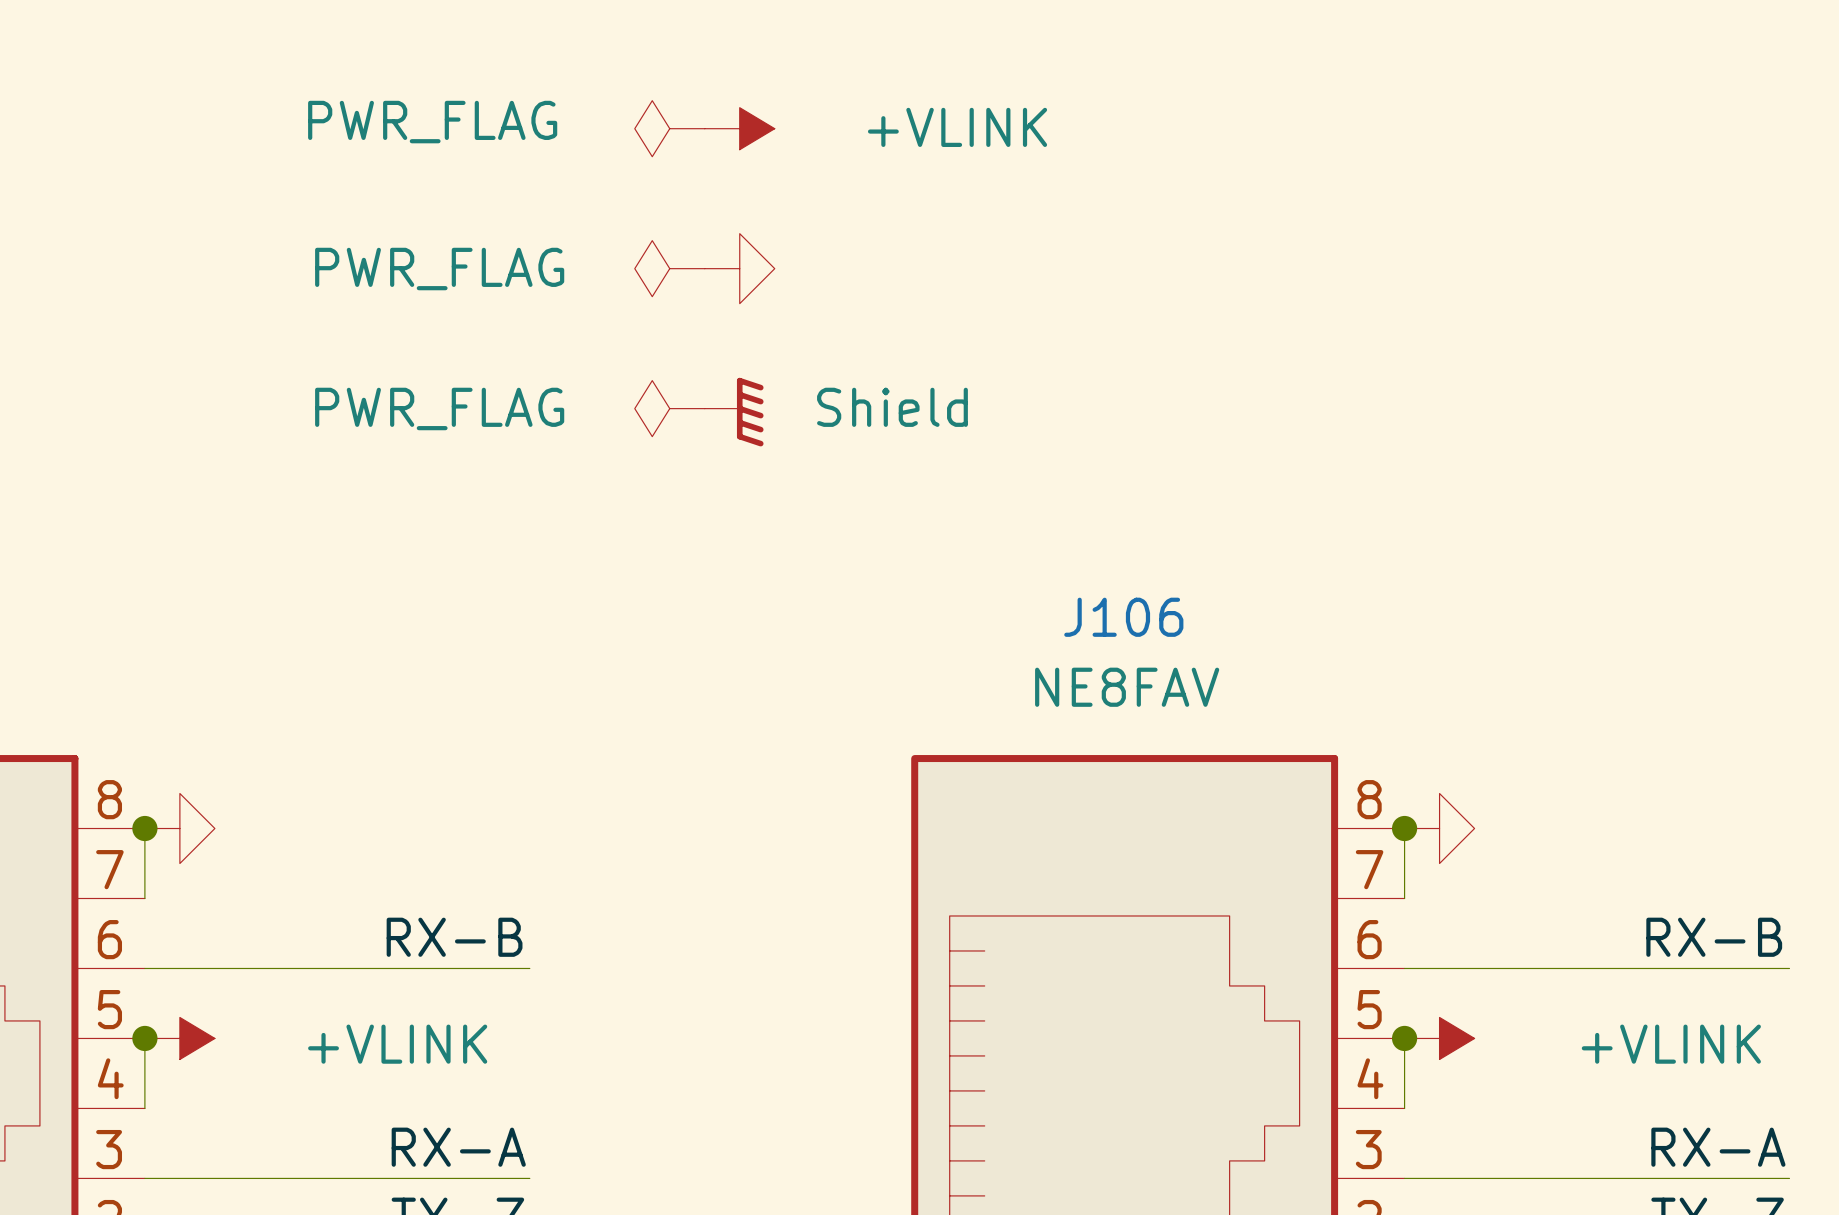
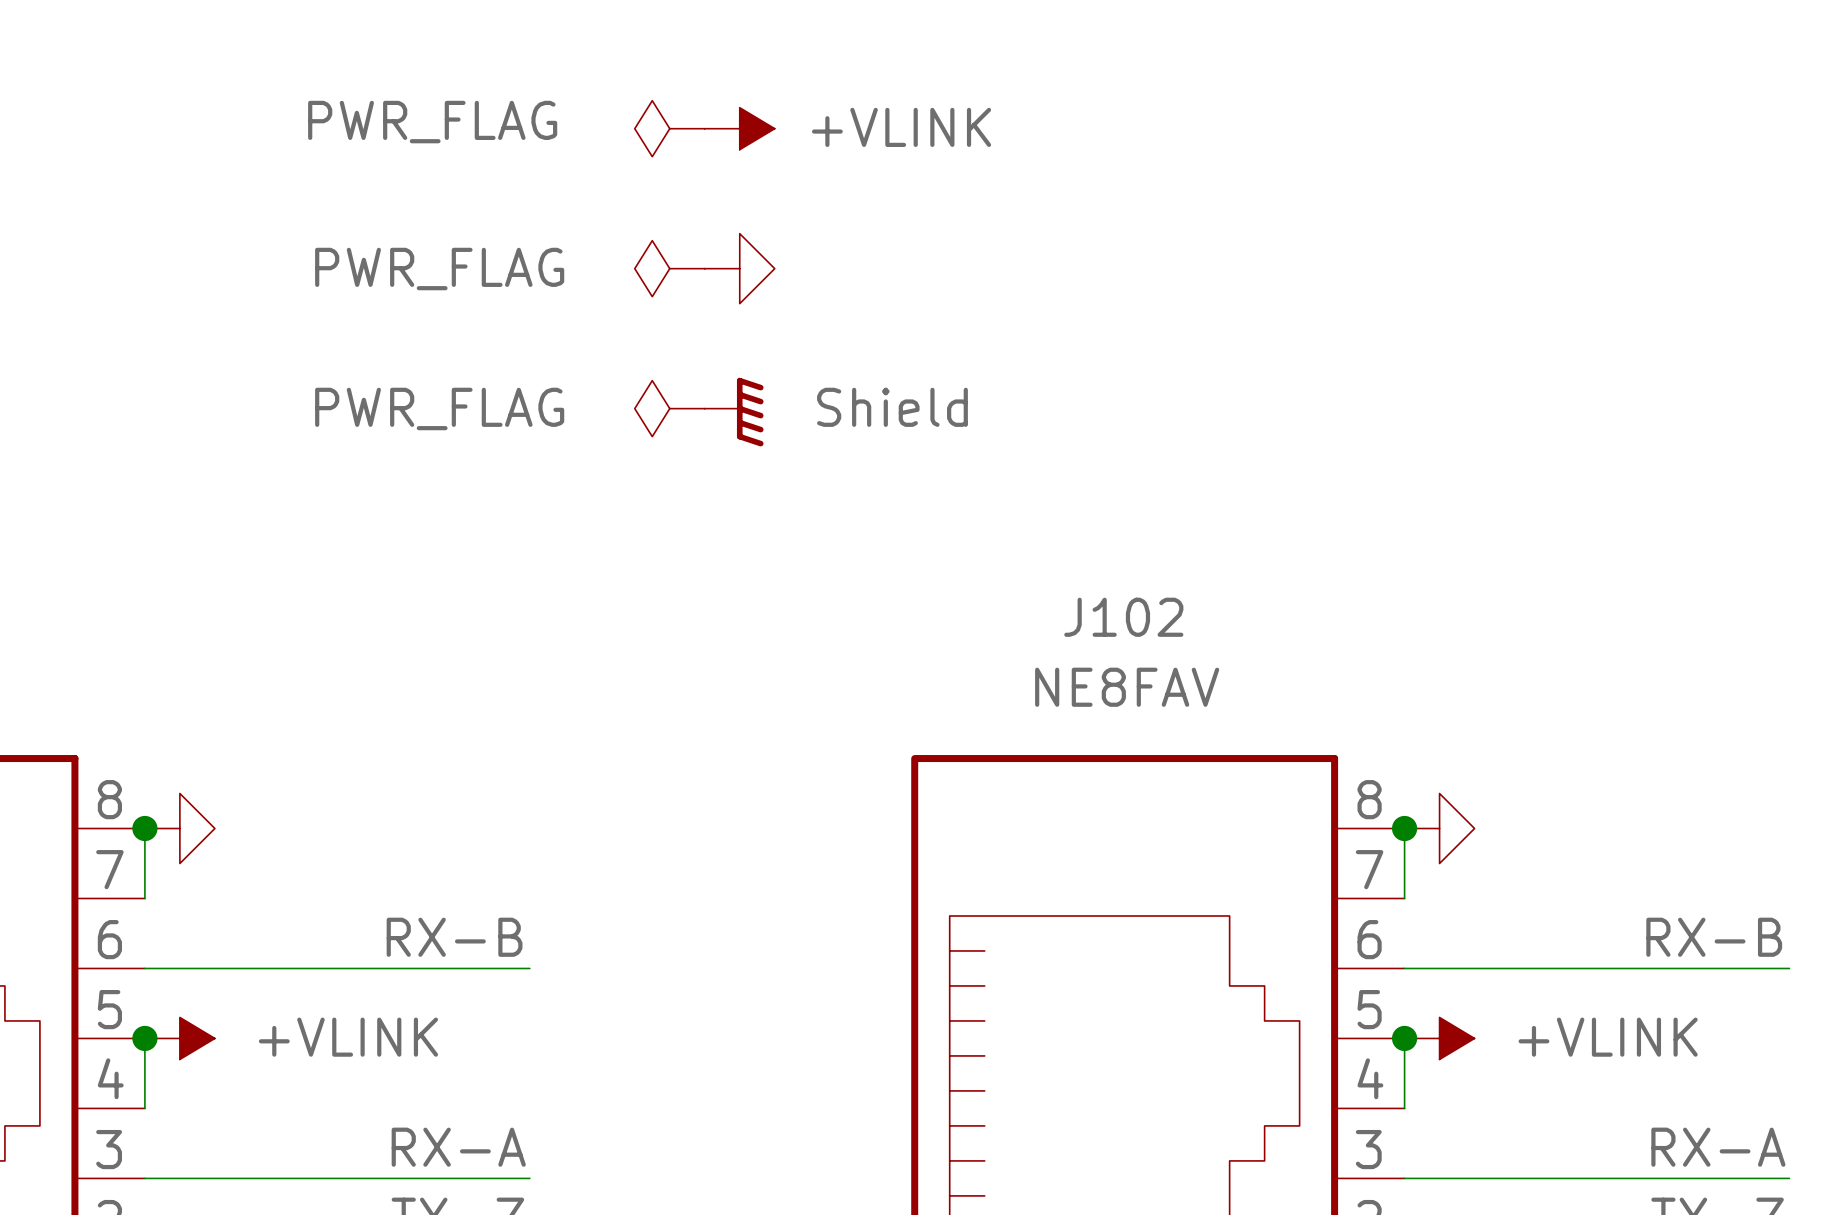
power symbol text position: +VLINK (957, 127) -> +VLINK (901, 127)
J106 name: J106 (1123, 617) -> J102 (1123, 617)
power symbol text position: +VLINK (397, 1044) -> +VLINK (348, 1037)
power symbol text position: +VLINK (1671, 1044) -> +VLINK (1608, 1037)

